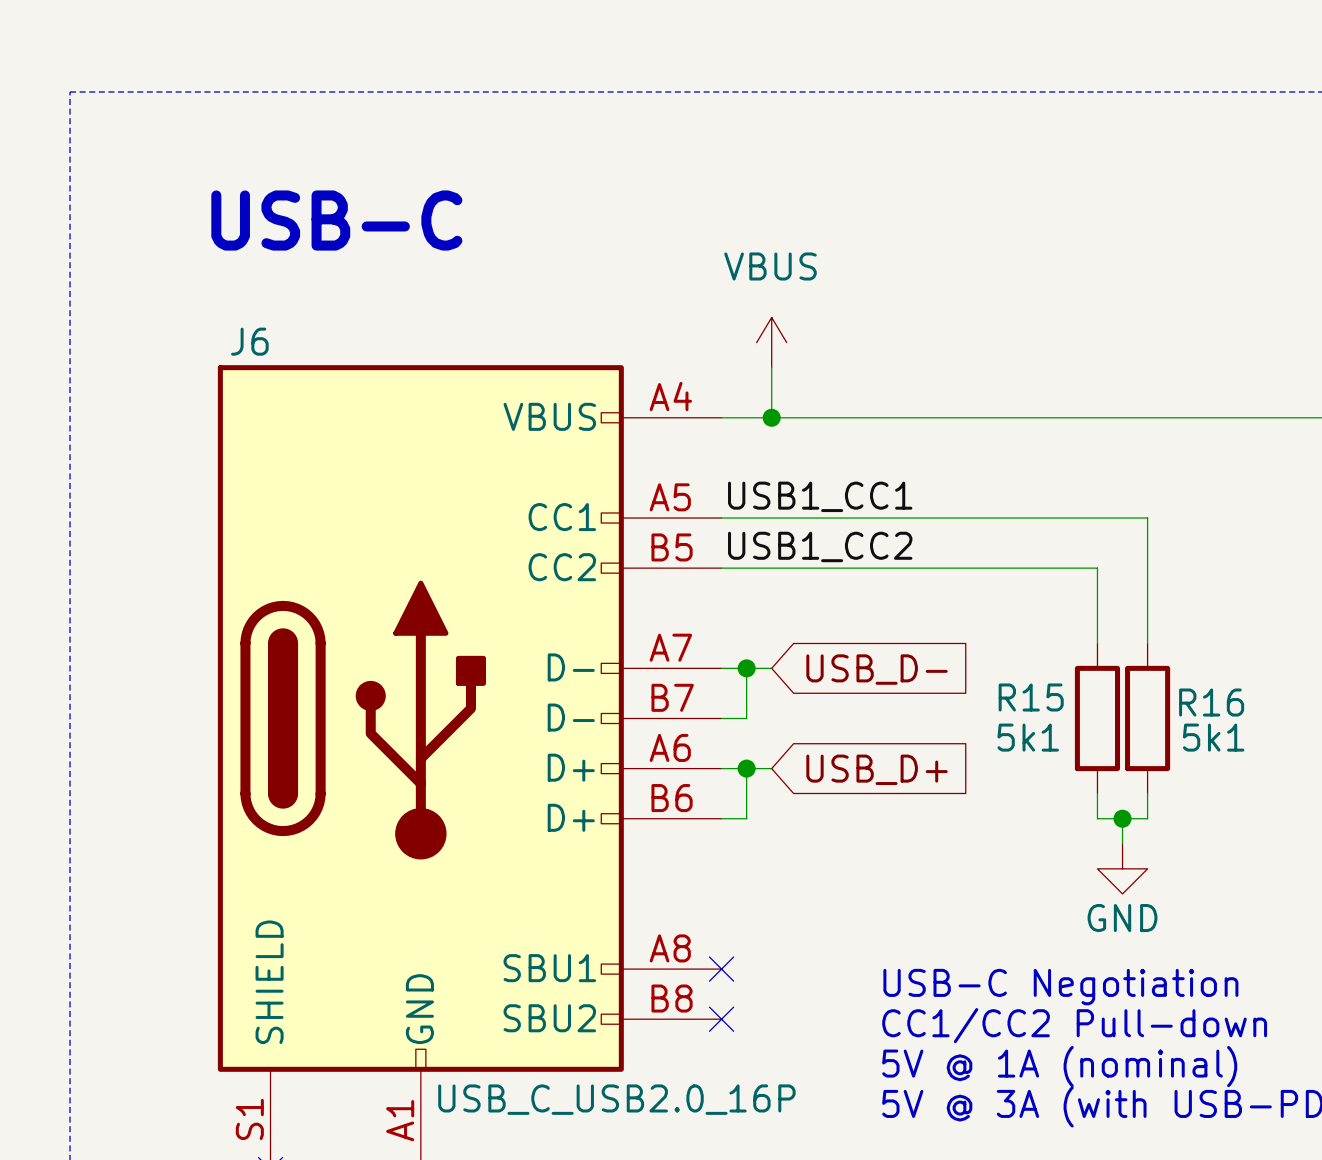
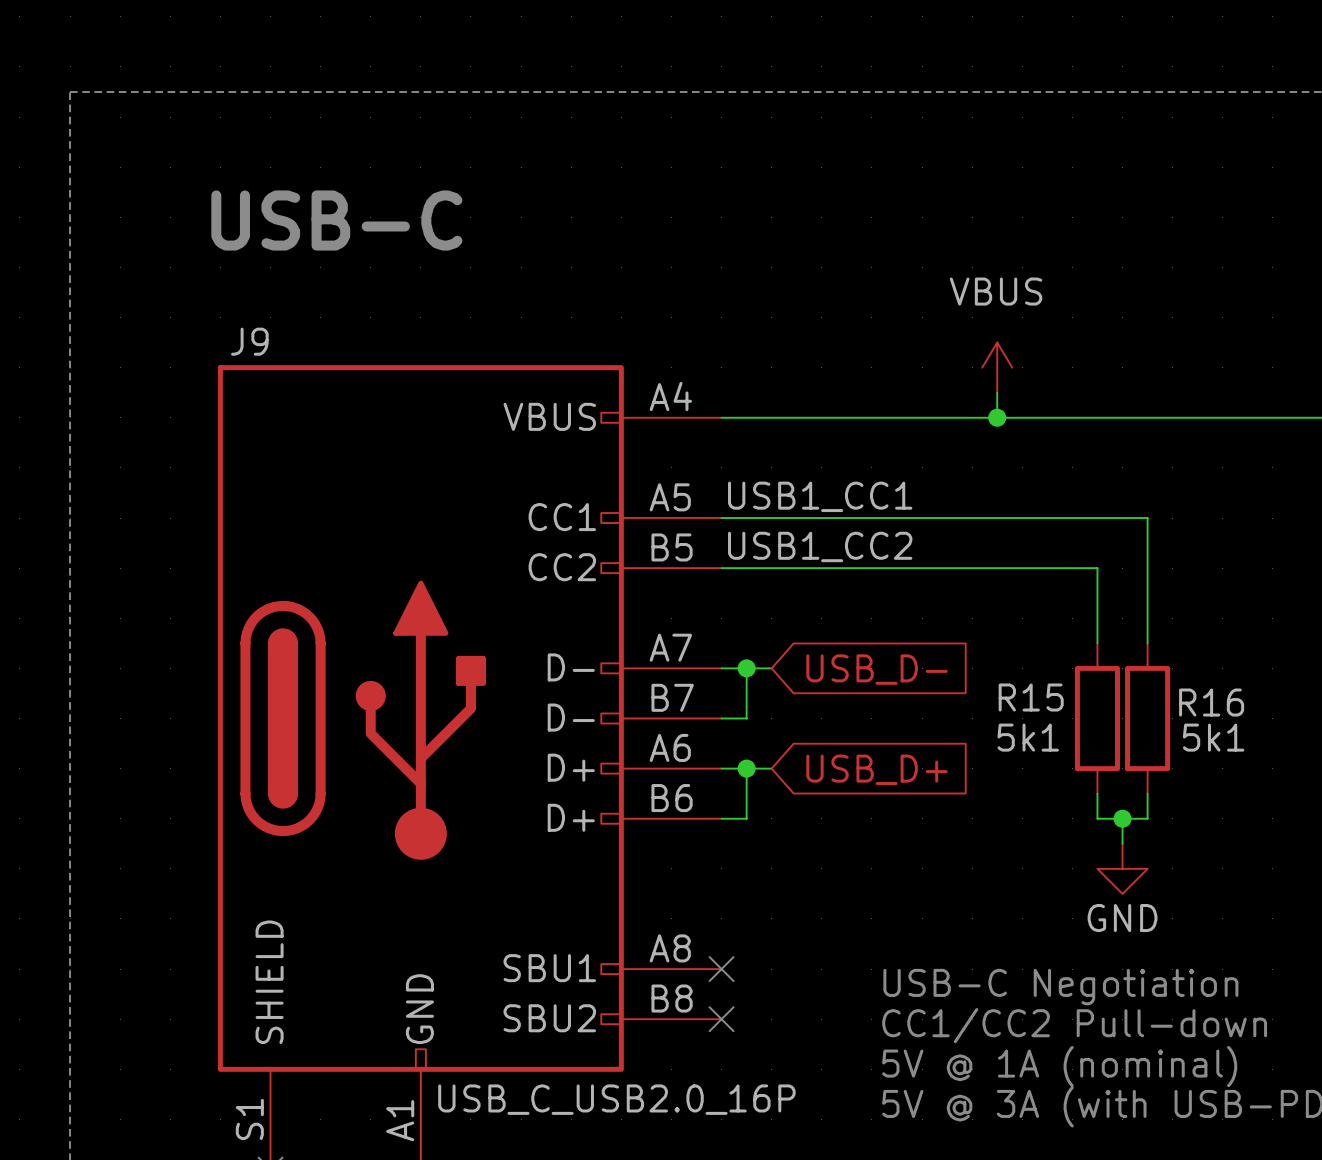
J6 name: J6 (249, 341) -> J9 (249, 341)
power symbol position: VBUS (771, 342) -> VBUS (997, 367)
wire: (771, 367) (771, 417) -> none
wire: none -> (997, 392) (997, 417)
junction: (771, 417) -> none
junction: none -> (997, 417)

